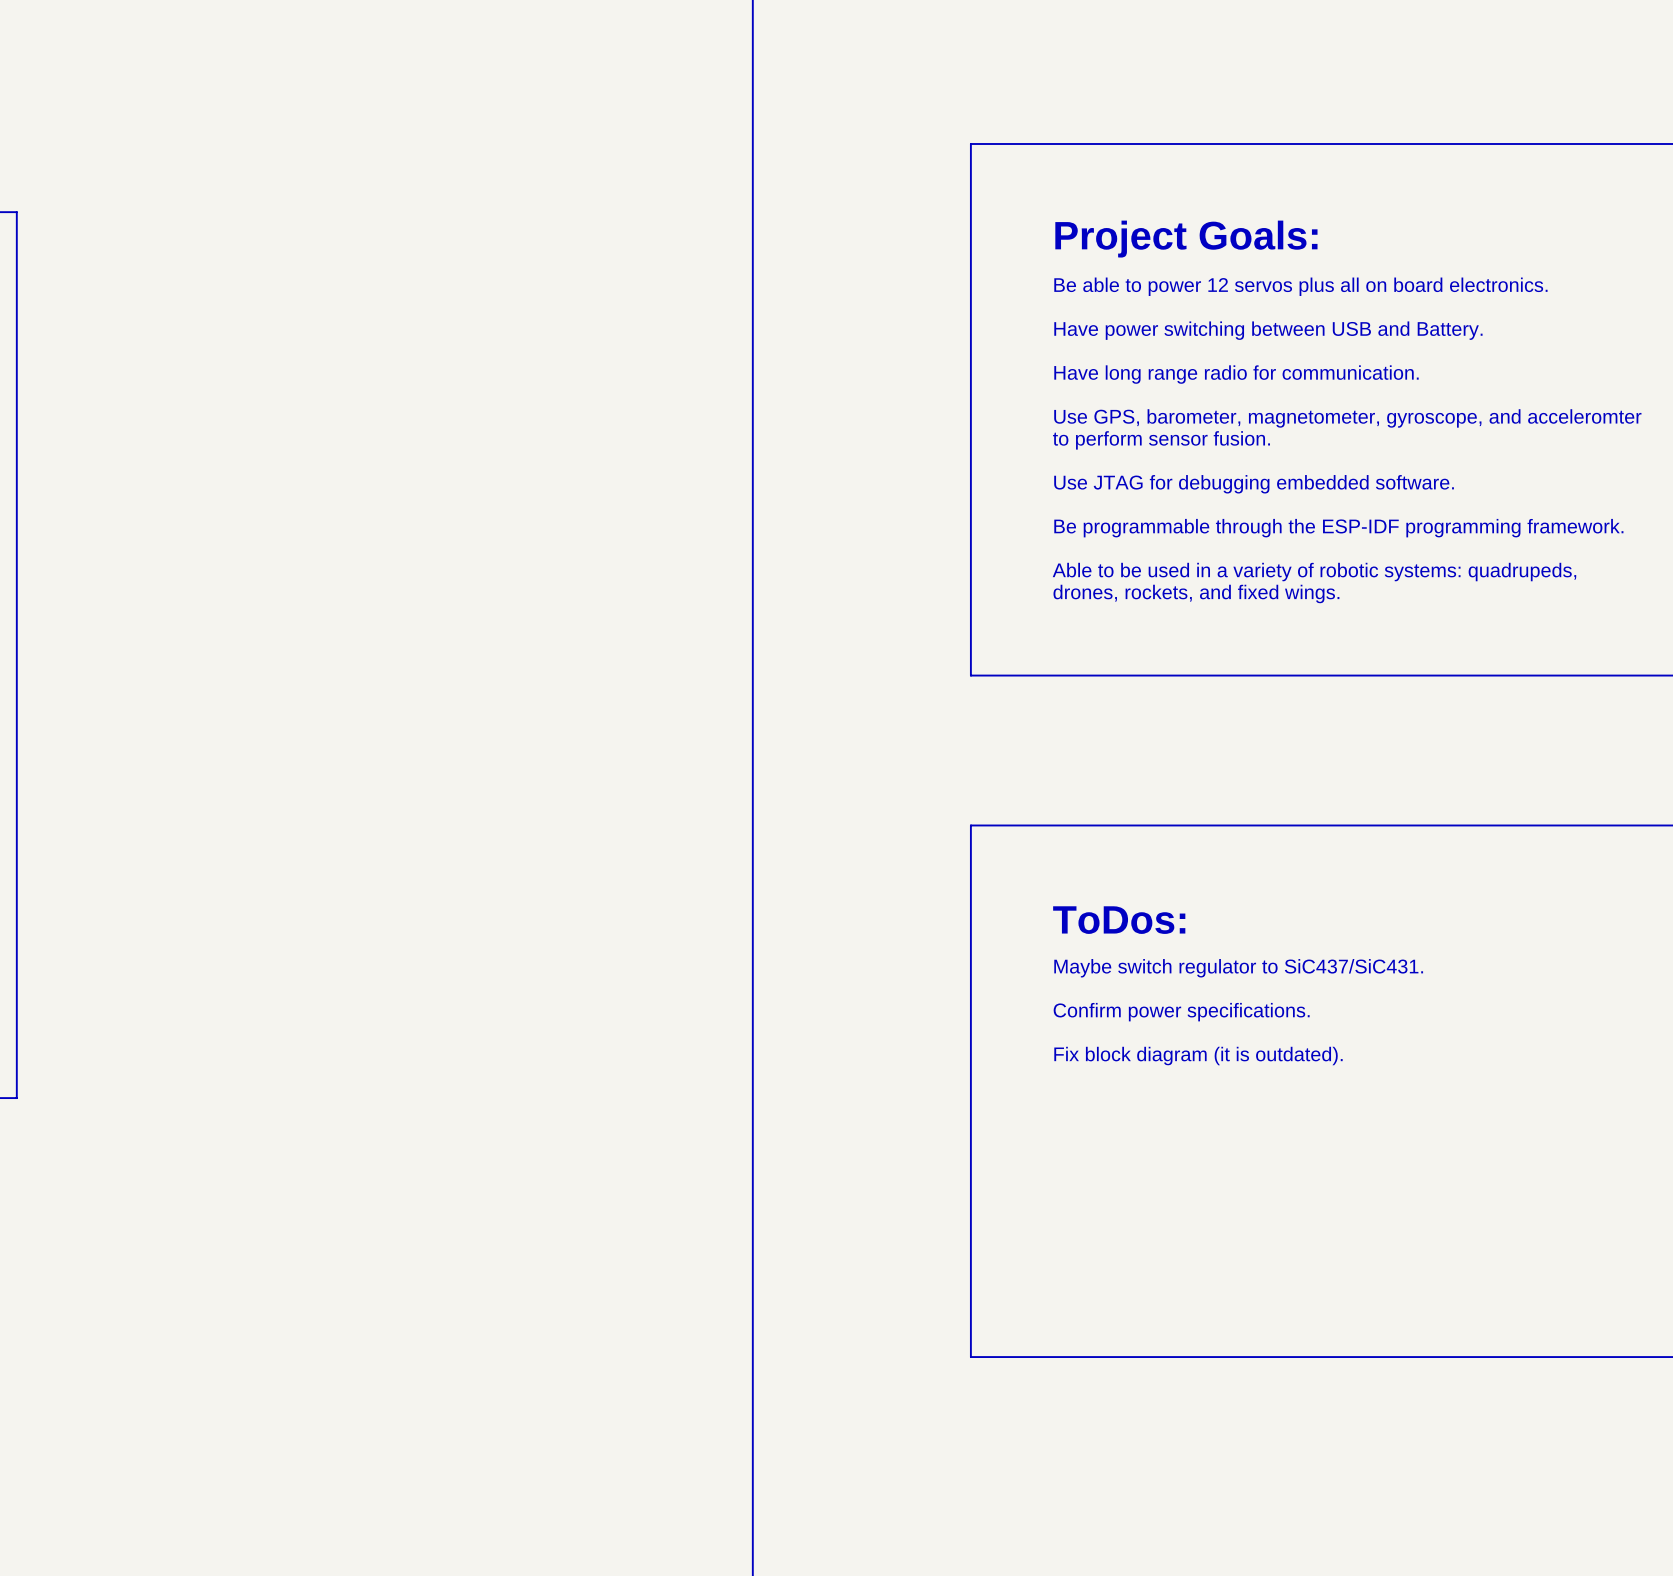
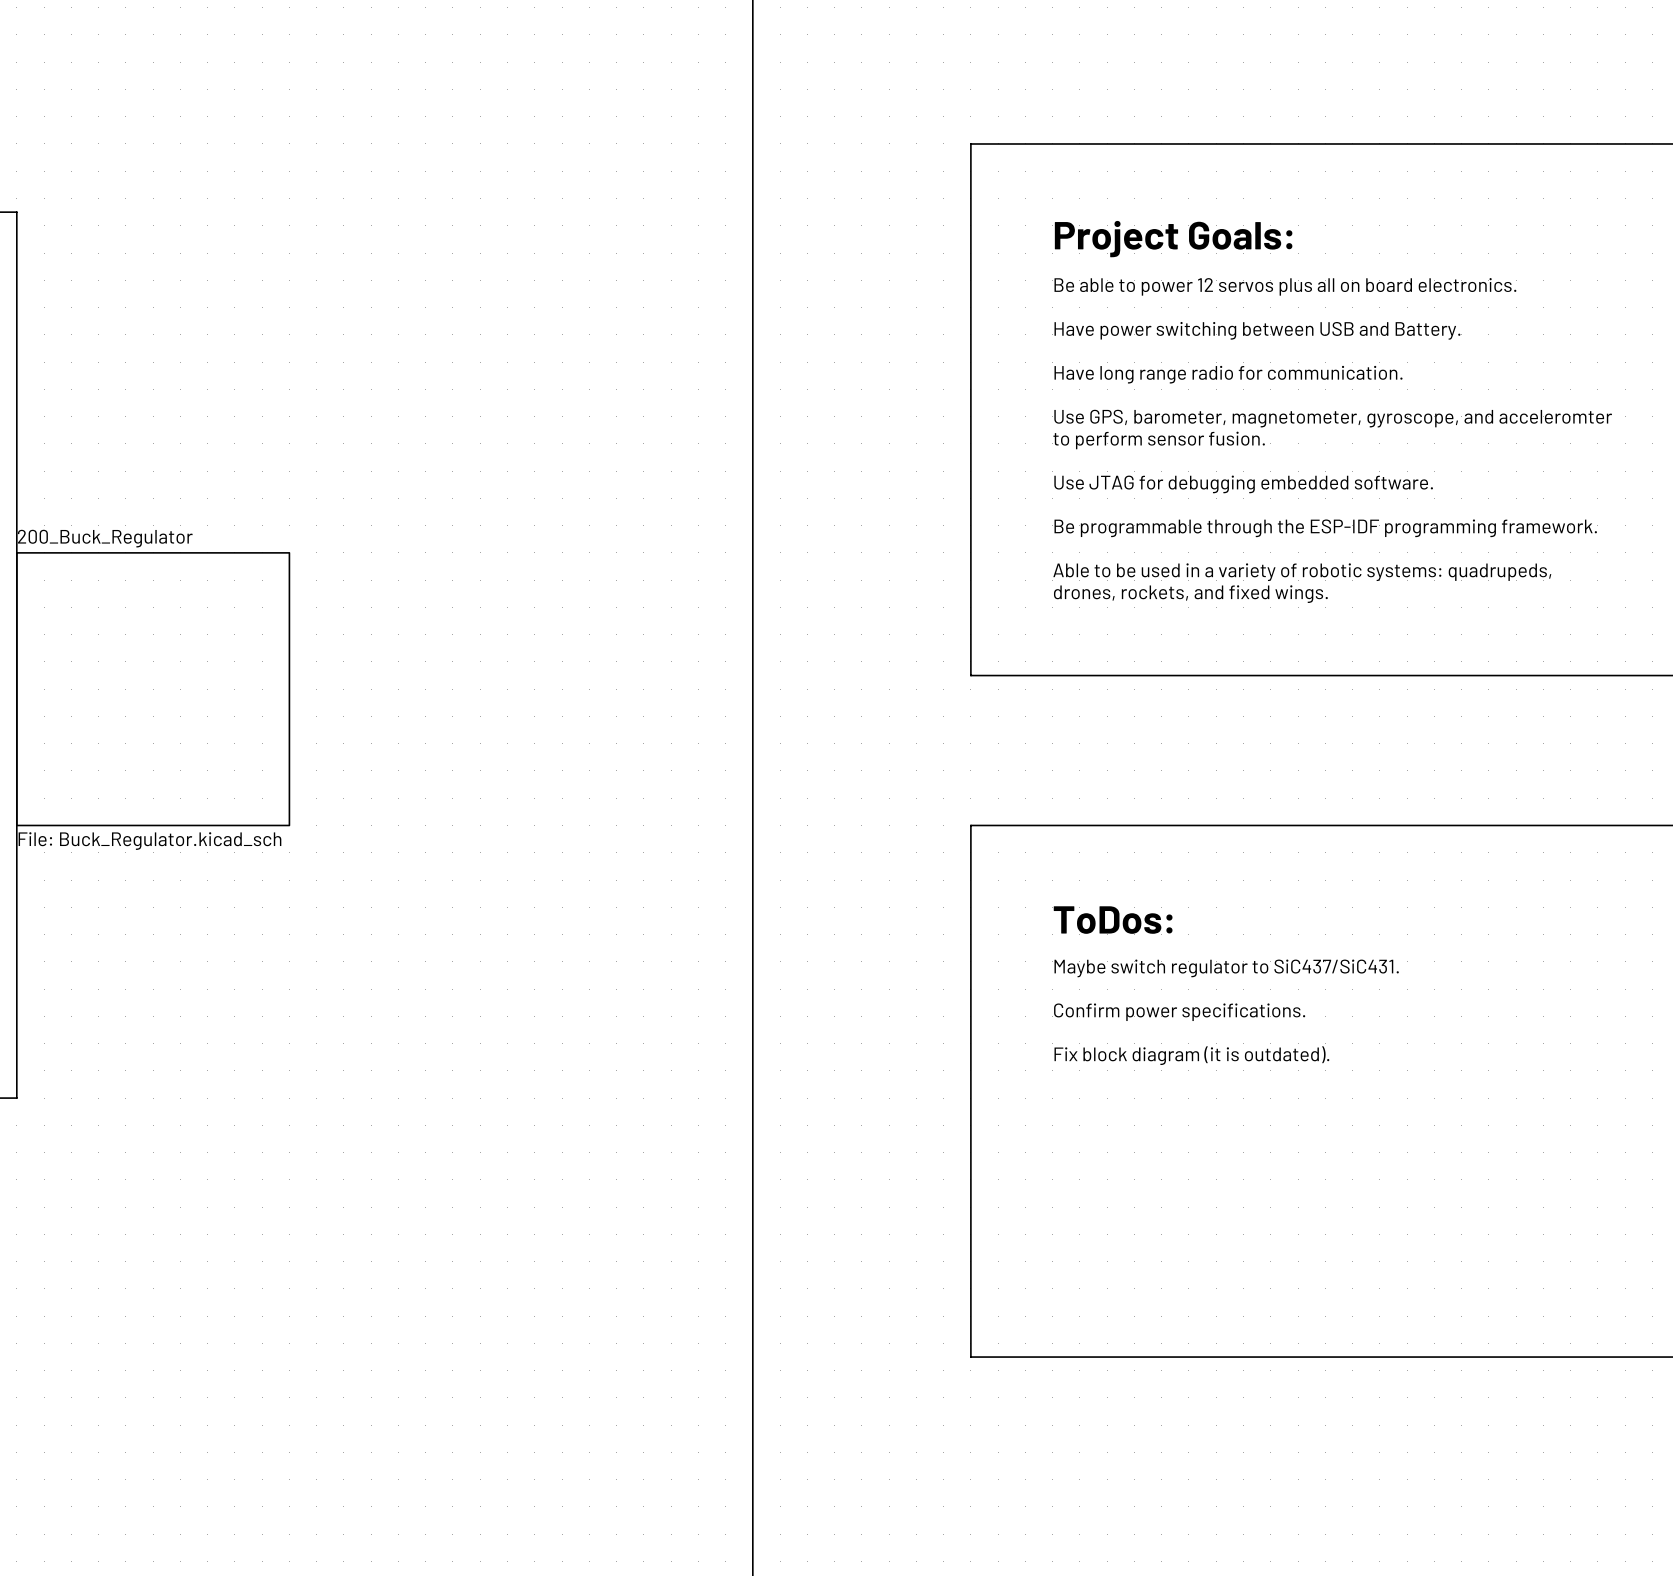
sheet 200_Buck_Regulator: none -> File: Buck_Regulator.kicad_sch (153, 689)

